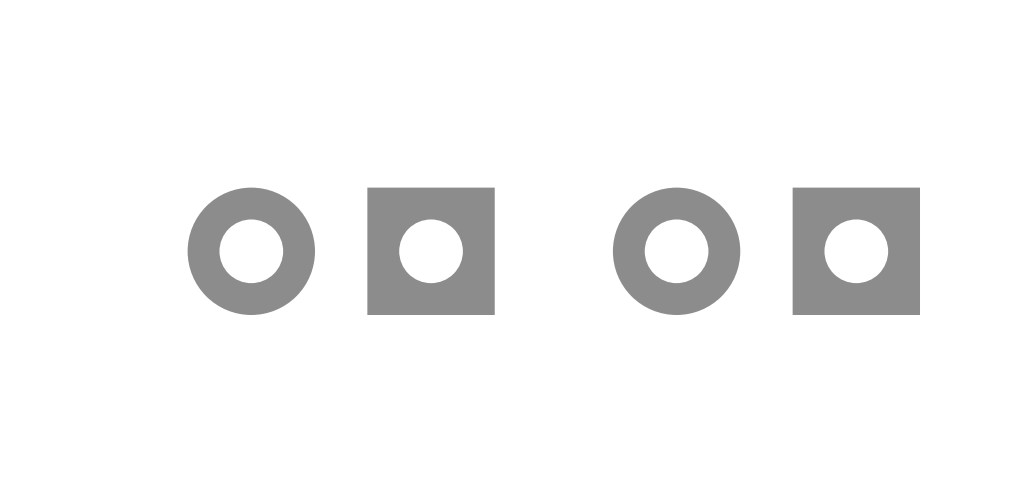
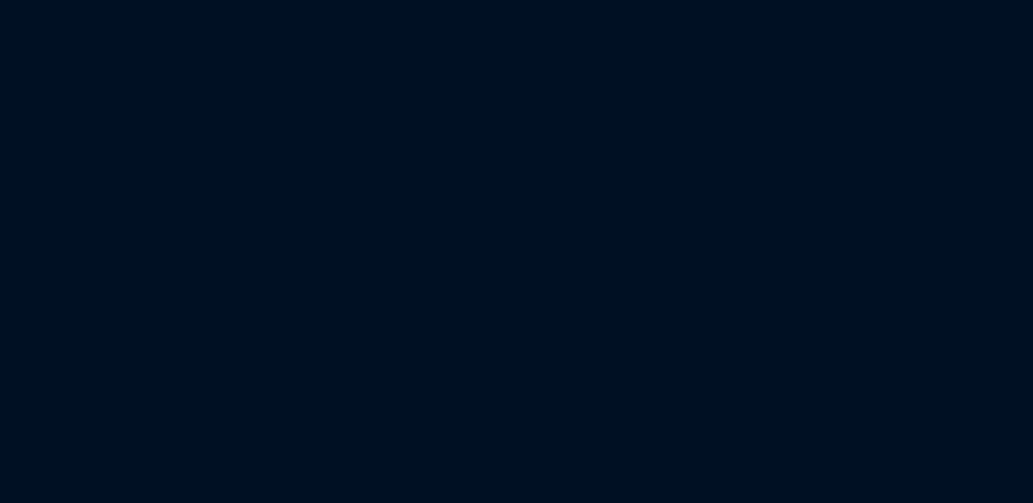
part: (341, 251) -> none
part: (766, 251) -> none

